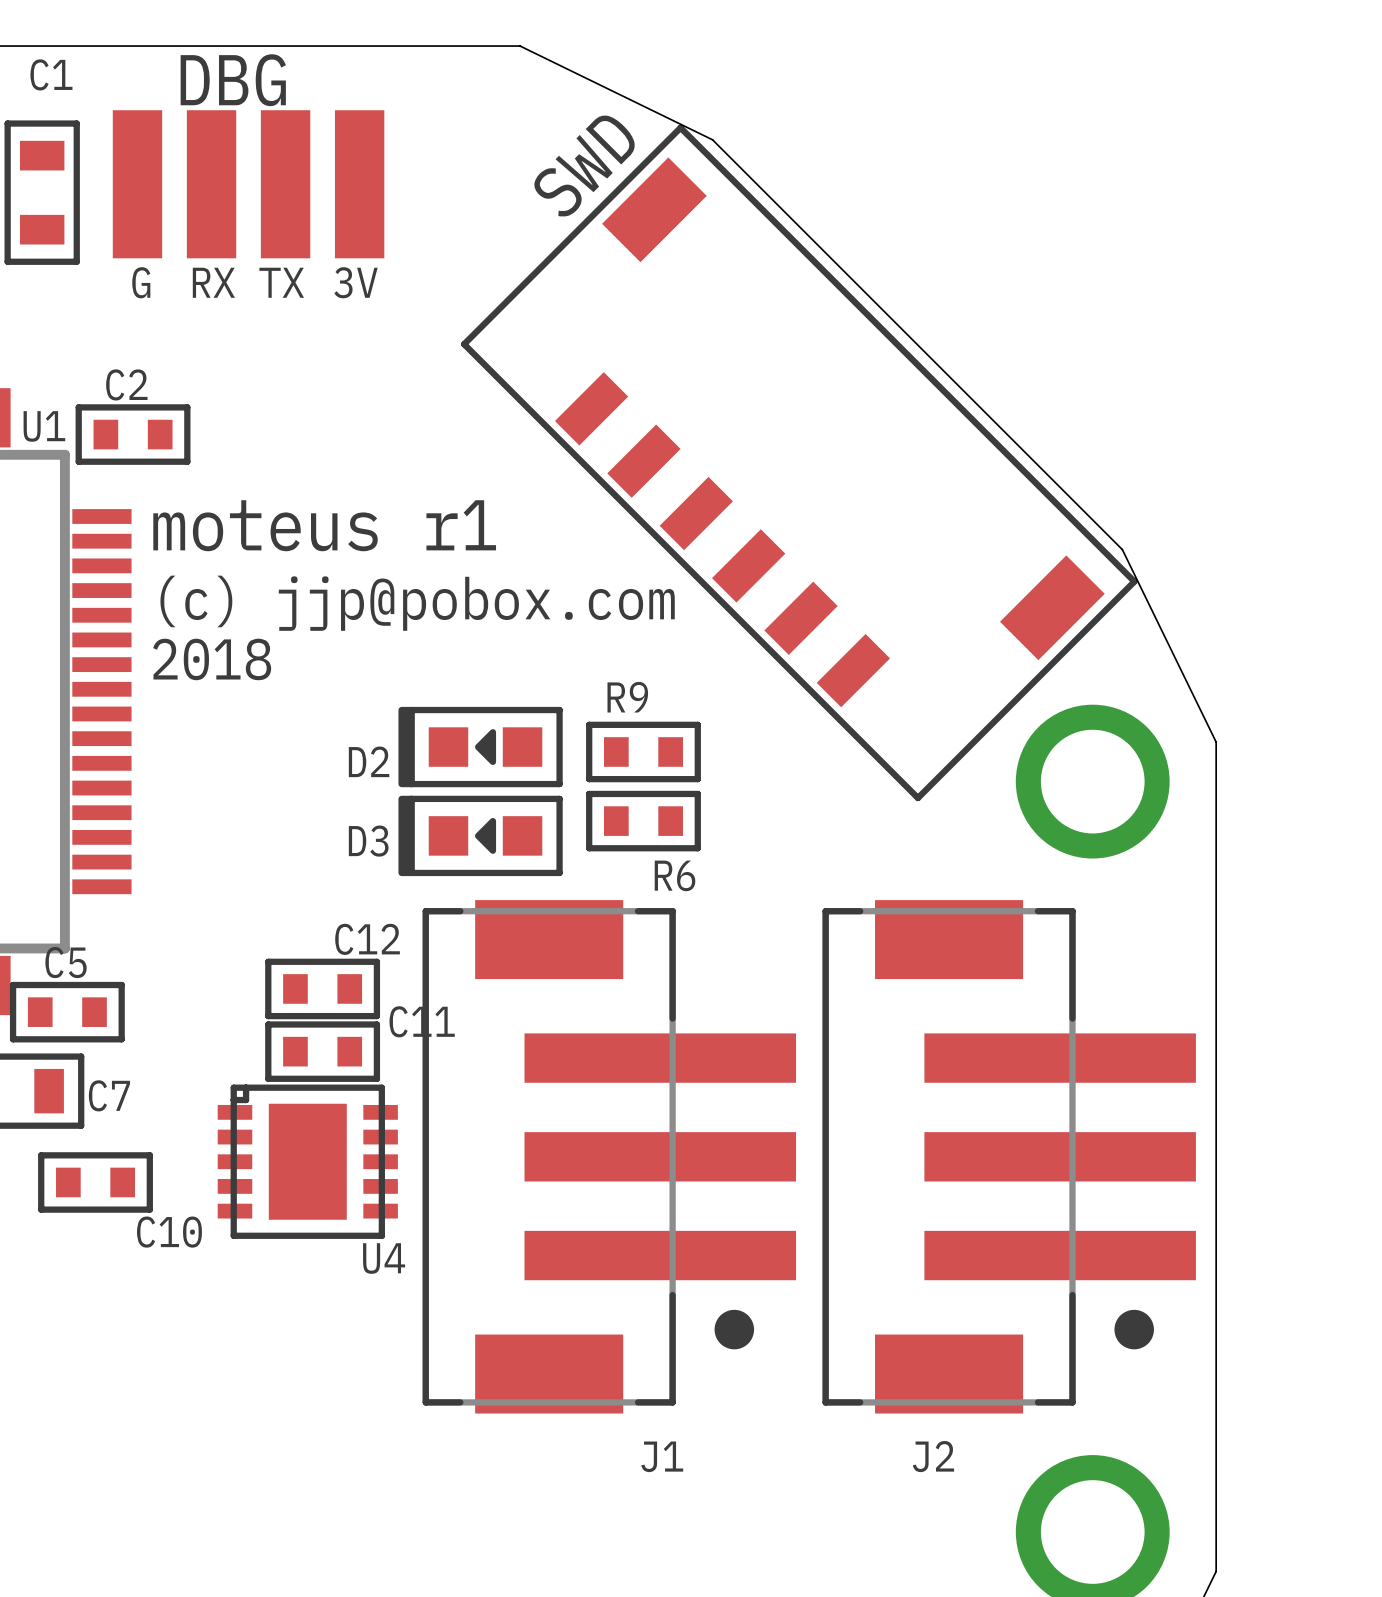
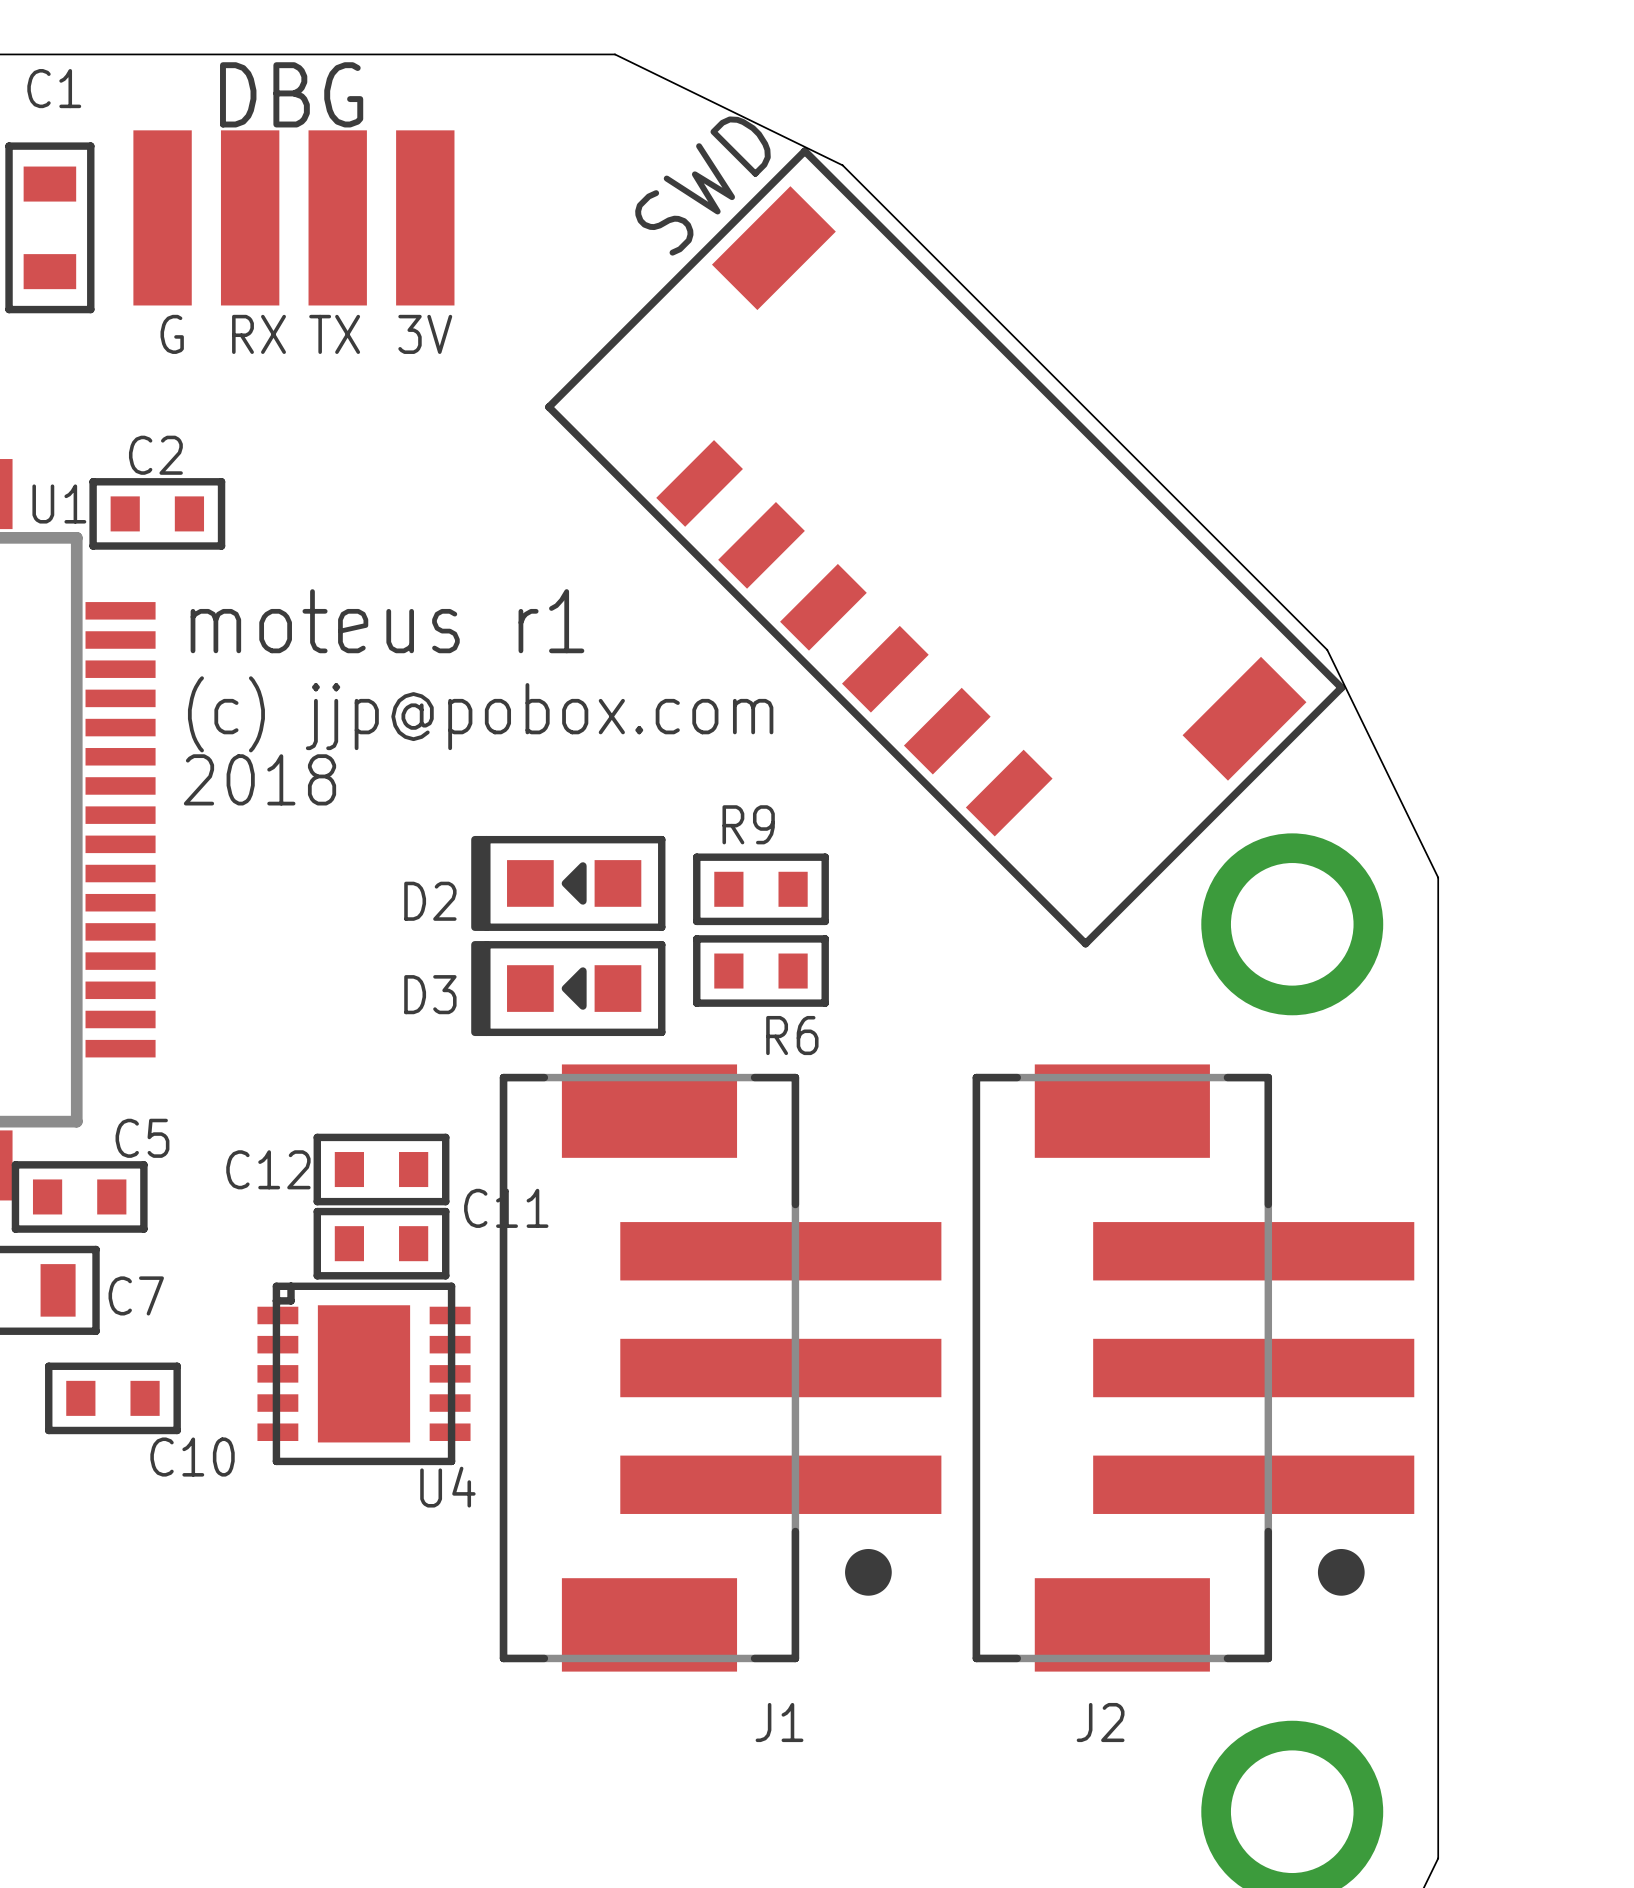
C12 name position: C12 (367, 939) -> C12 (268, 1169)
C5 name position: C5 (66, 962) -> C5 (142, 1138)

